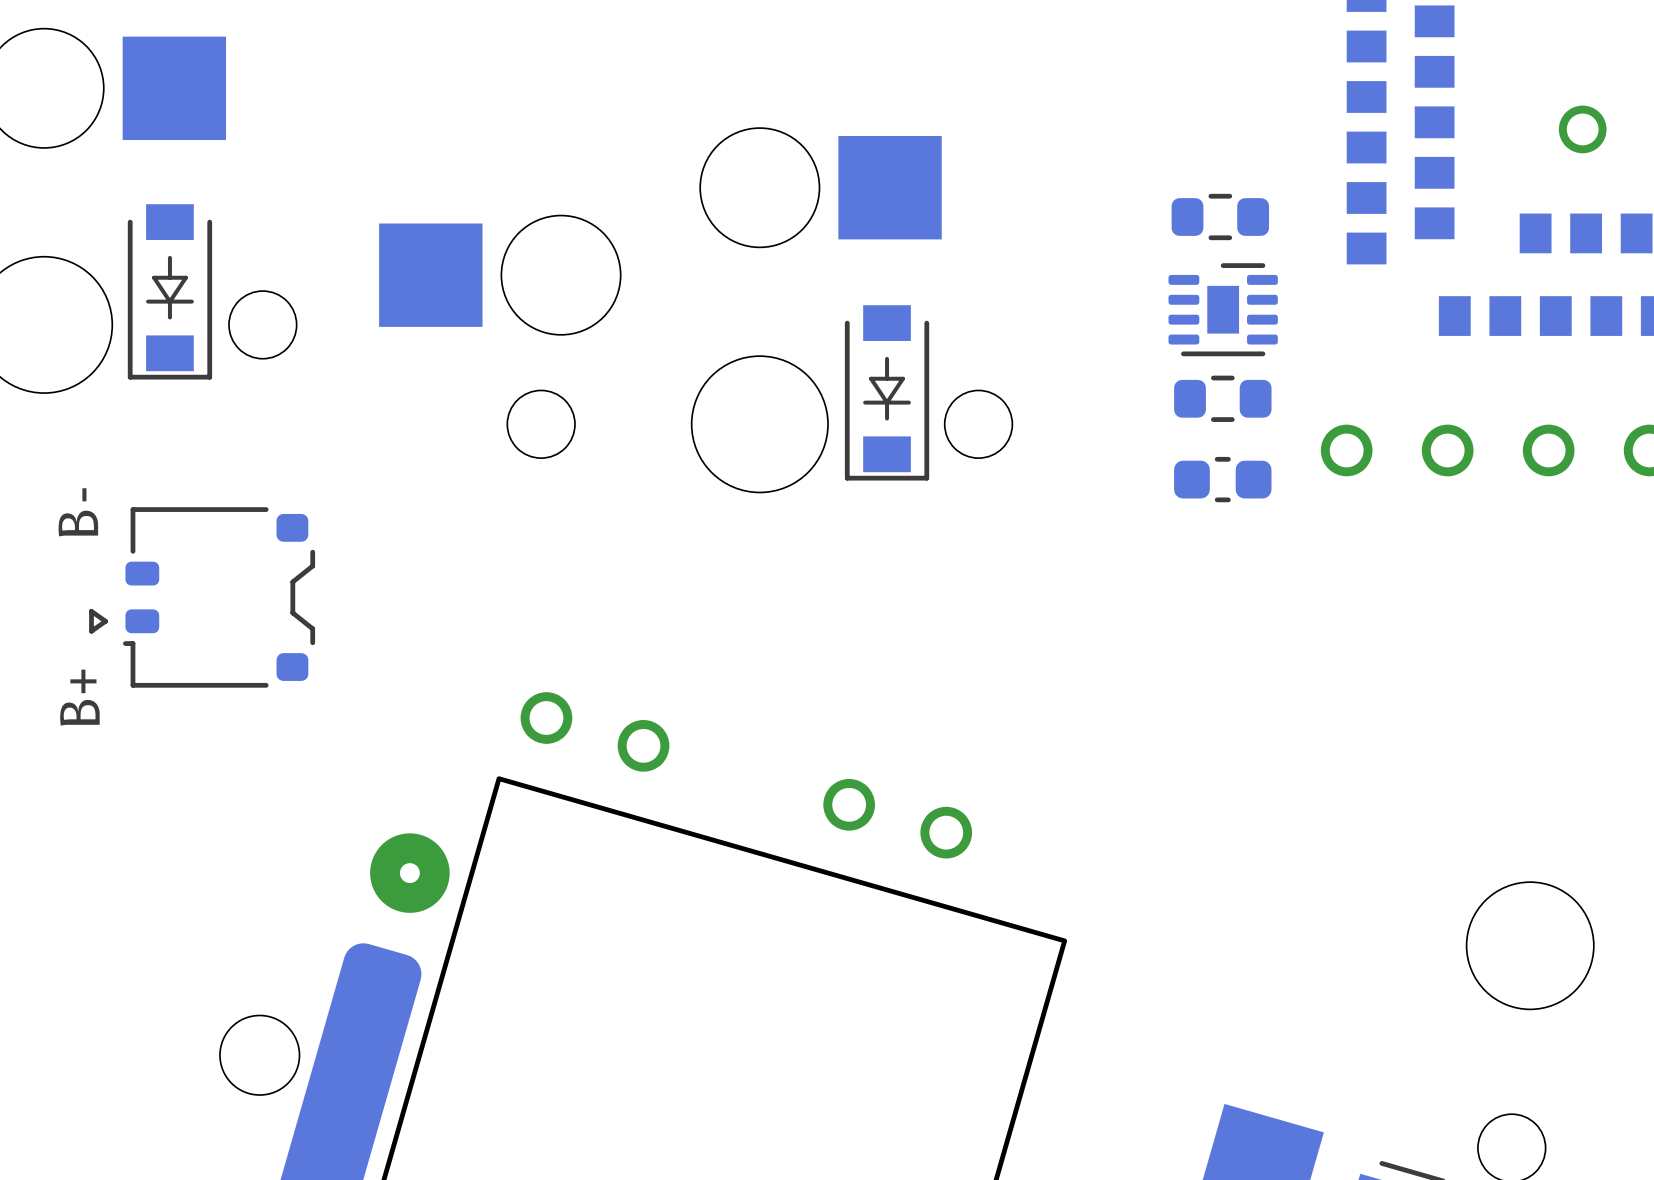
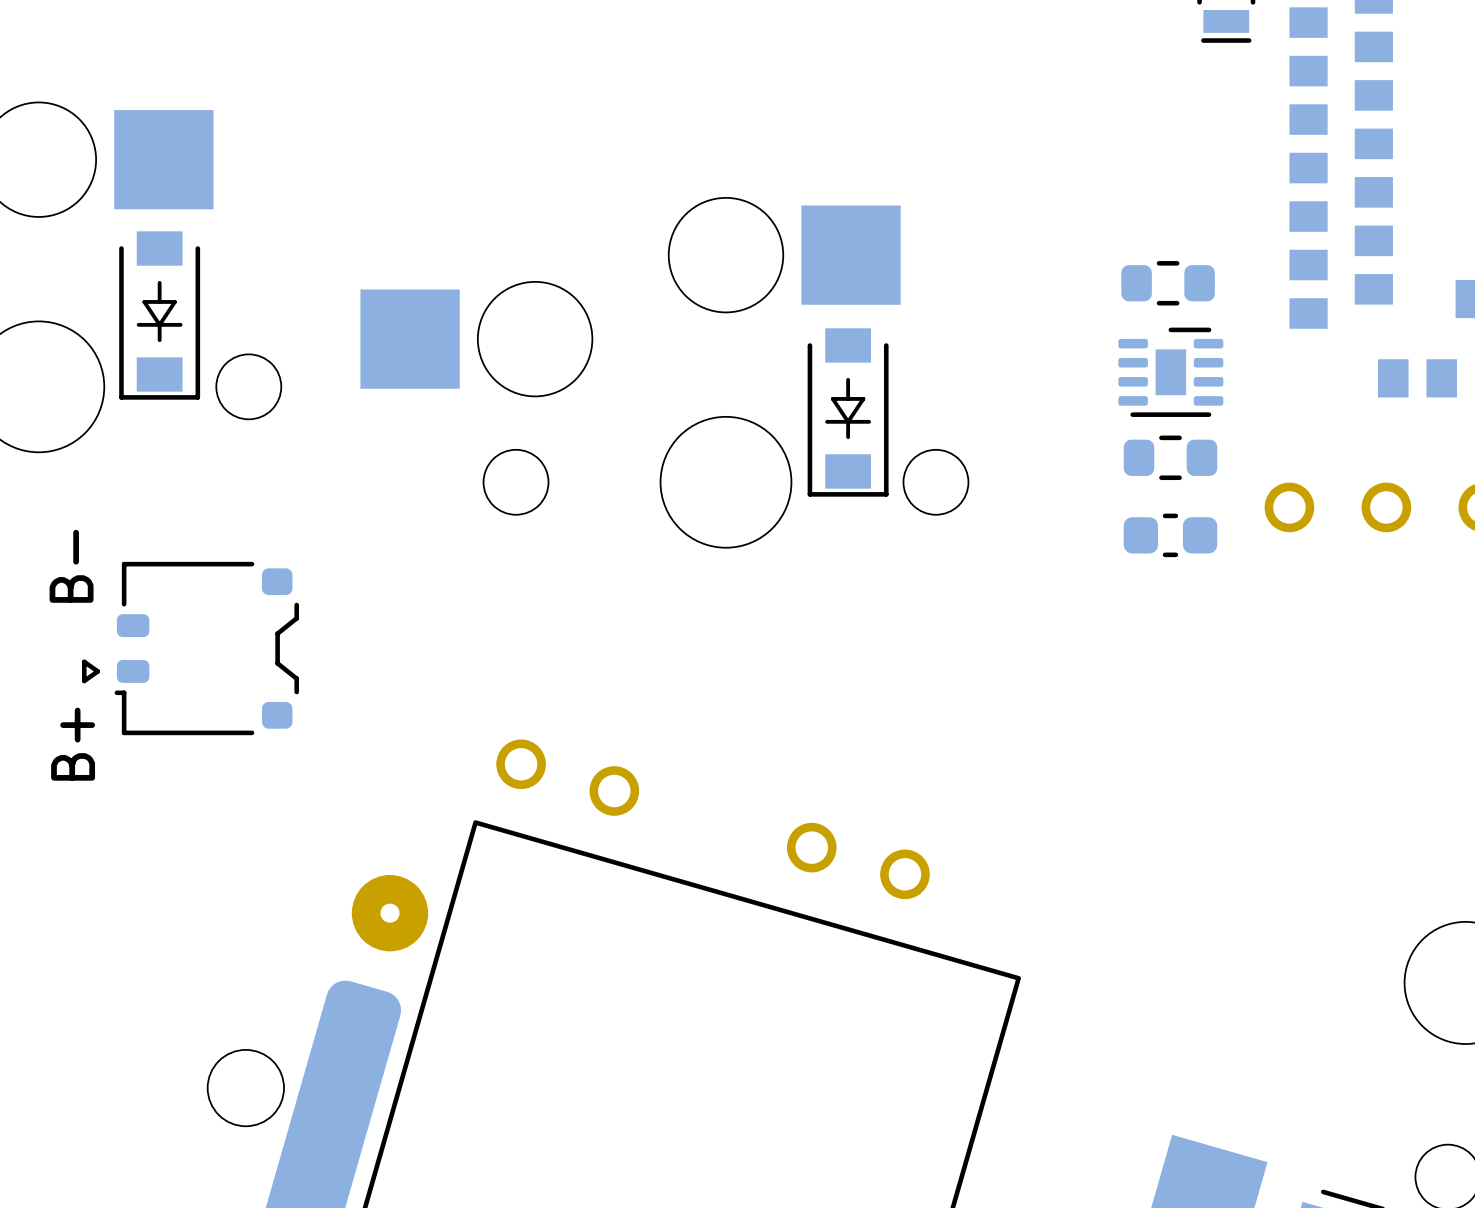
part position: (169, 291) -> (159, 315)
part position: (887, 392) -> (848, 412)

